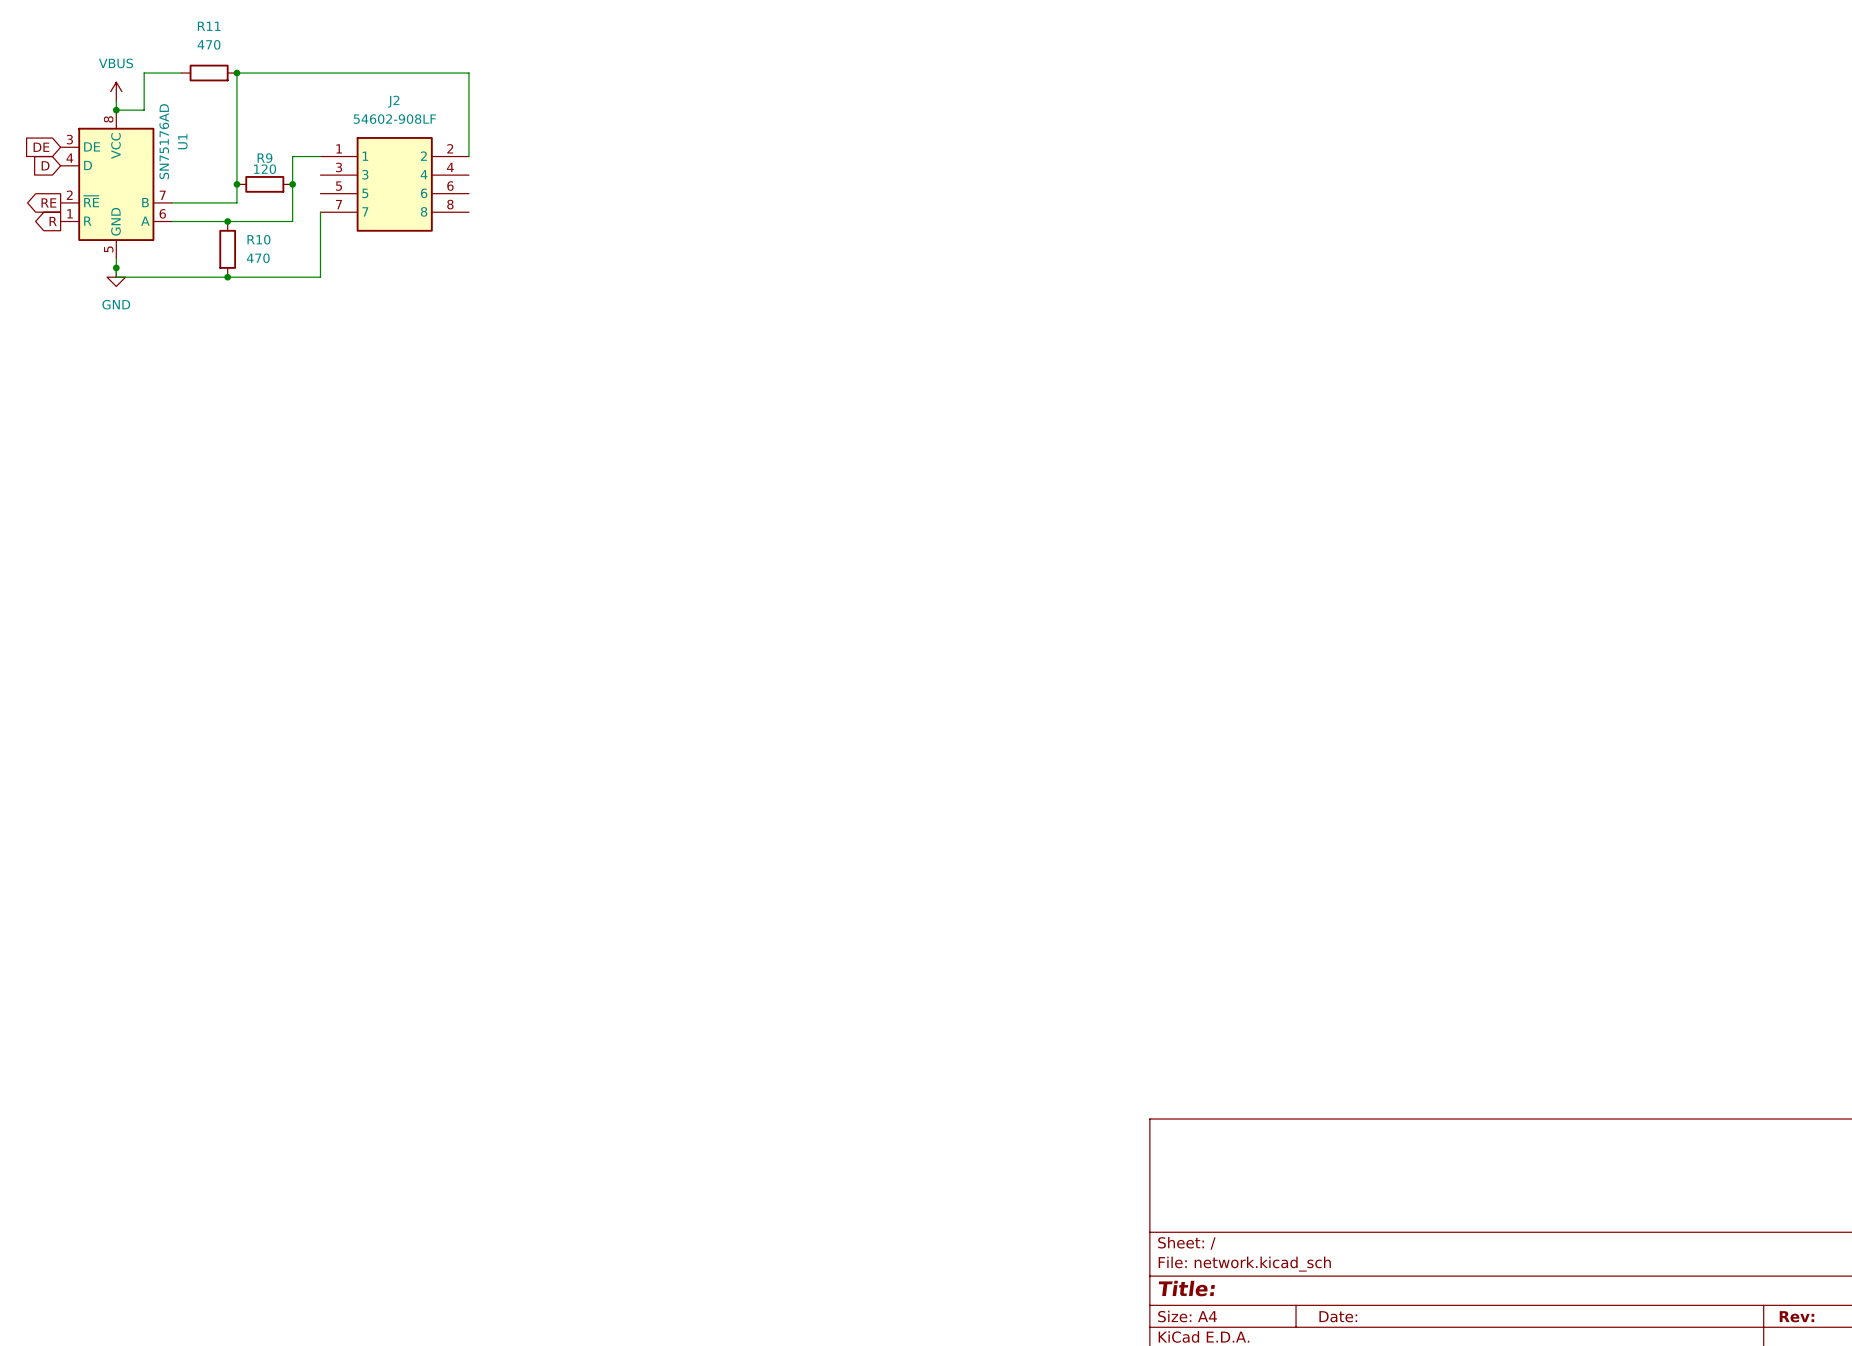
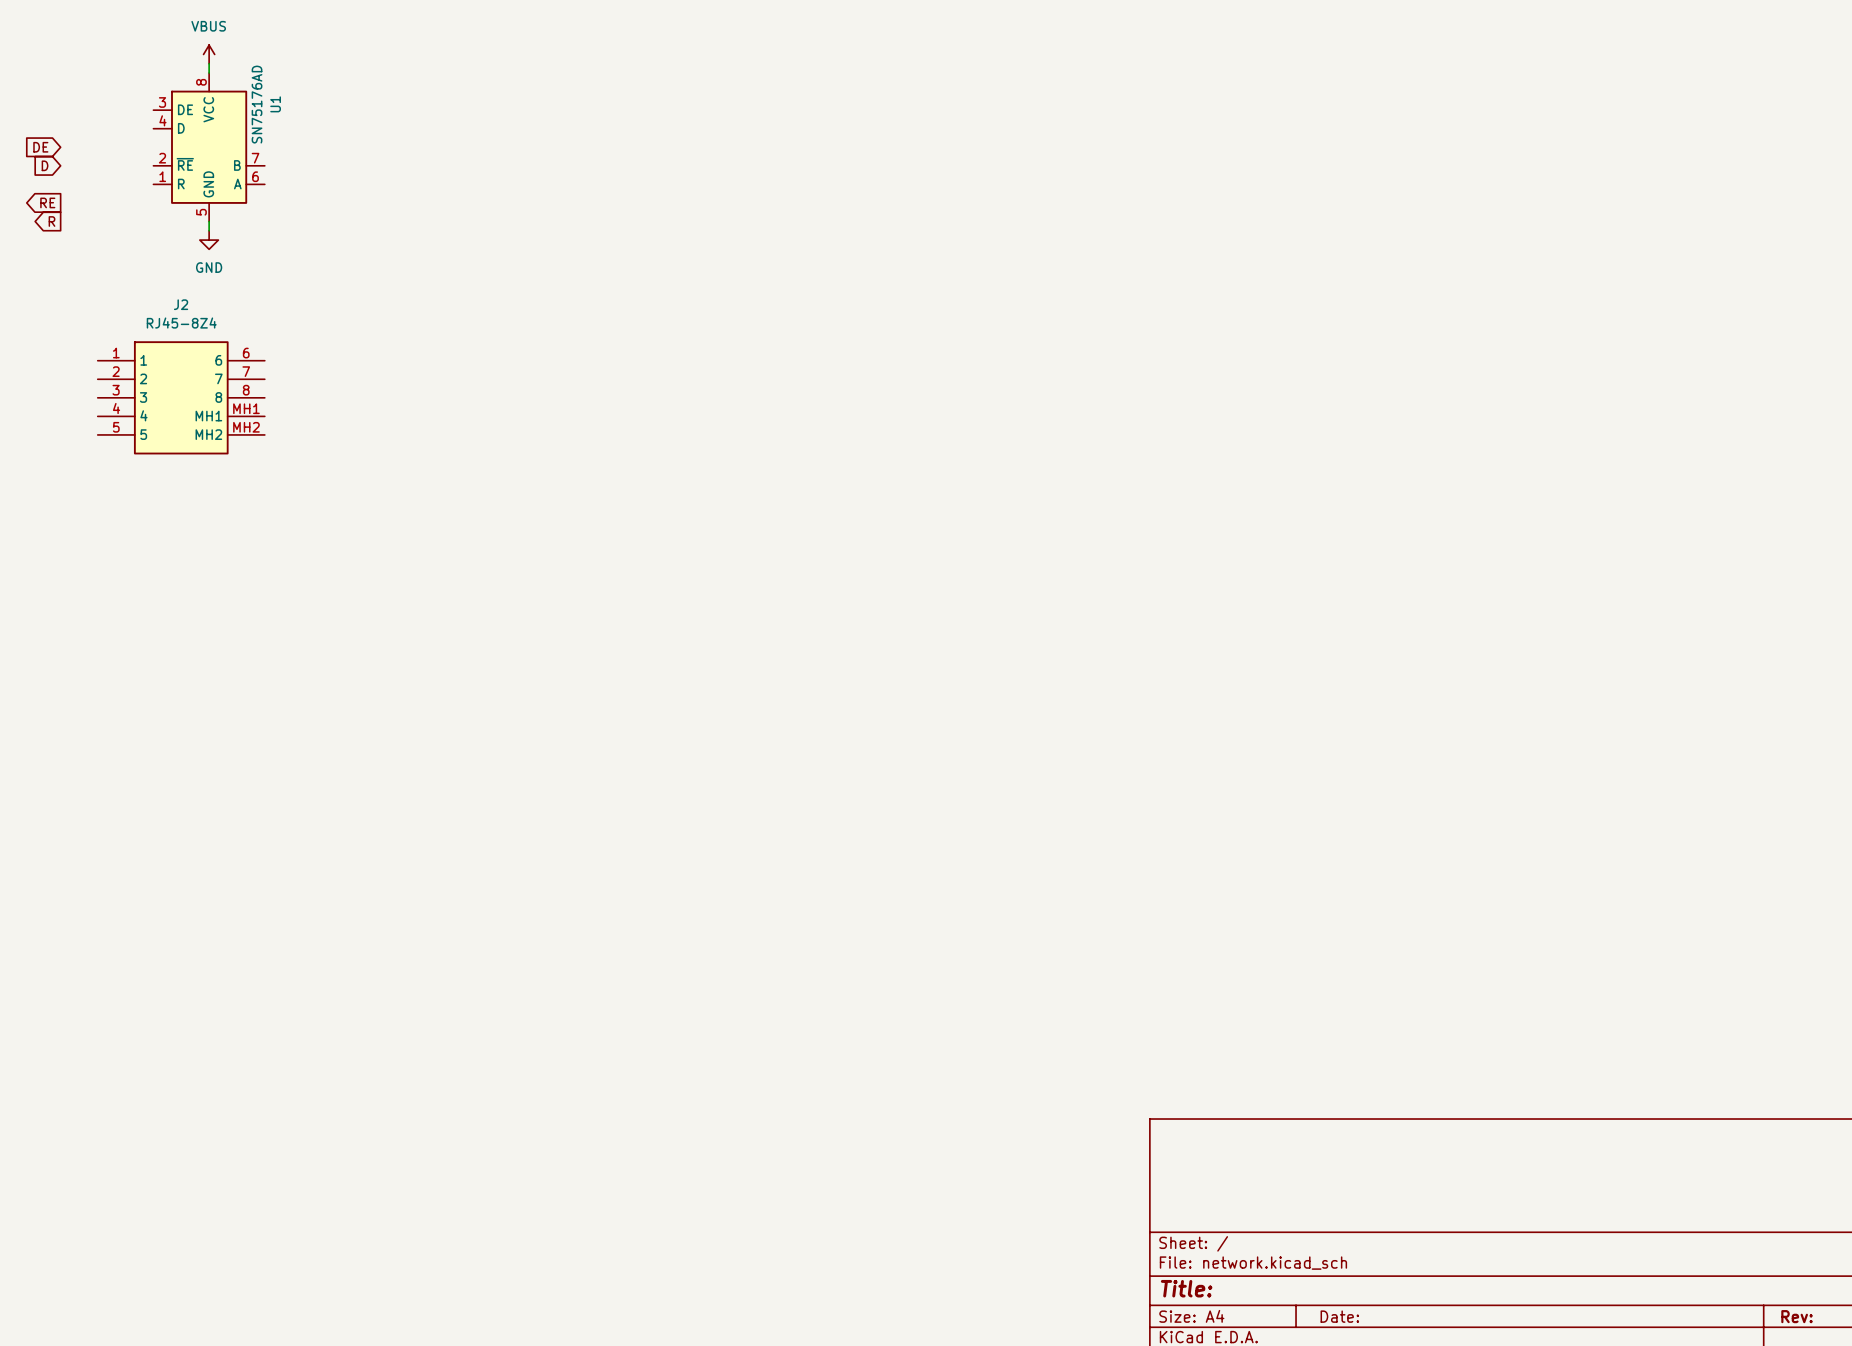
wire: none -> (209, 63) (209, 73)
wire: (181, 73) (144, 73) (144, 110) (116, 110) (116, 100) -> none
R11: 470 (209, 73) -> none
junction: (236, 73) -> none
power symbol position: VBUS (116, 91) -> VBUS (209, 54)
junction: (116, 110) -> none
J2 value: 54602-908LF (394, 119) -> RJ45-8Z4 (181, 323)
J2 symbol: [320, 137, 469, 232] -> [97, 341, 265, 455]
wire: (320, 156) (292, 156) (292, 221) (172, 221) -> none
wire: (468, 156) (468, 73) (236, 73) (236, 202) (172, 202) -> none
U1 position: (116, 184) -> (209, 147)
junction: (236, 184) -> none
R9: 120 (264, 184) -> none
junction: (292, 184) -> none
wire: (320, 212) (320, 277) (116, 277) (116, 258) -> none
wire: none -> (209, 221) (209, 230)
junction: (227, 221) -> none
R10: 470 (227, 249) -> none
junction: (116, 267) -> none
power symbol position: GND (116, 277) -> GND (209, 240)
junction: (227, 277) -> none

